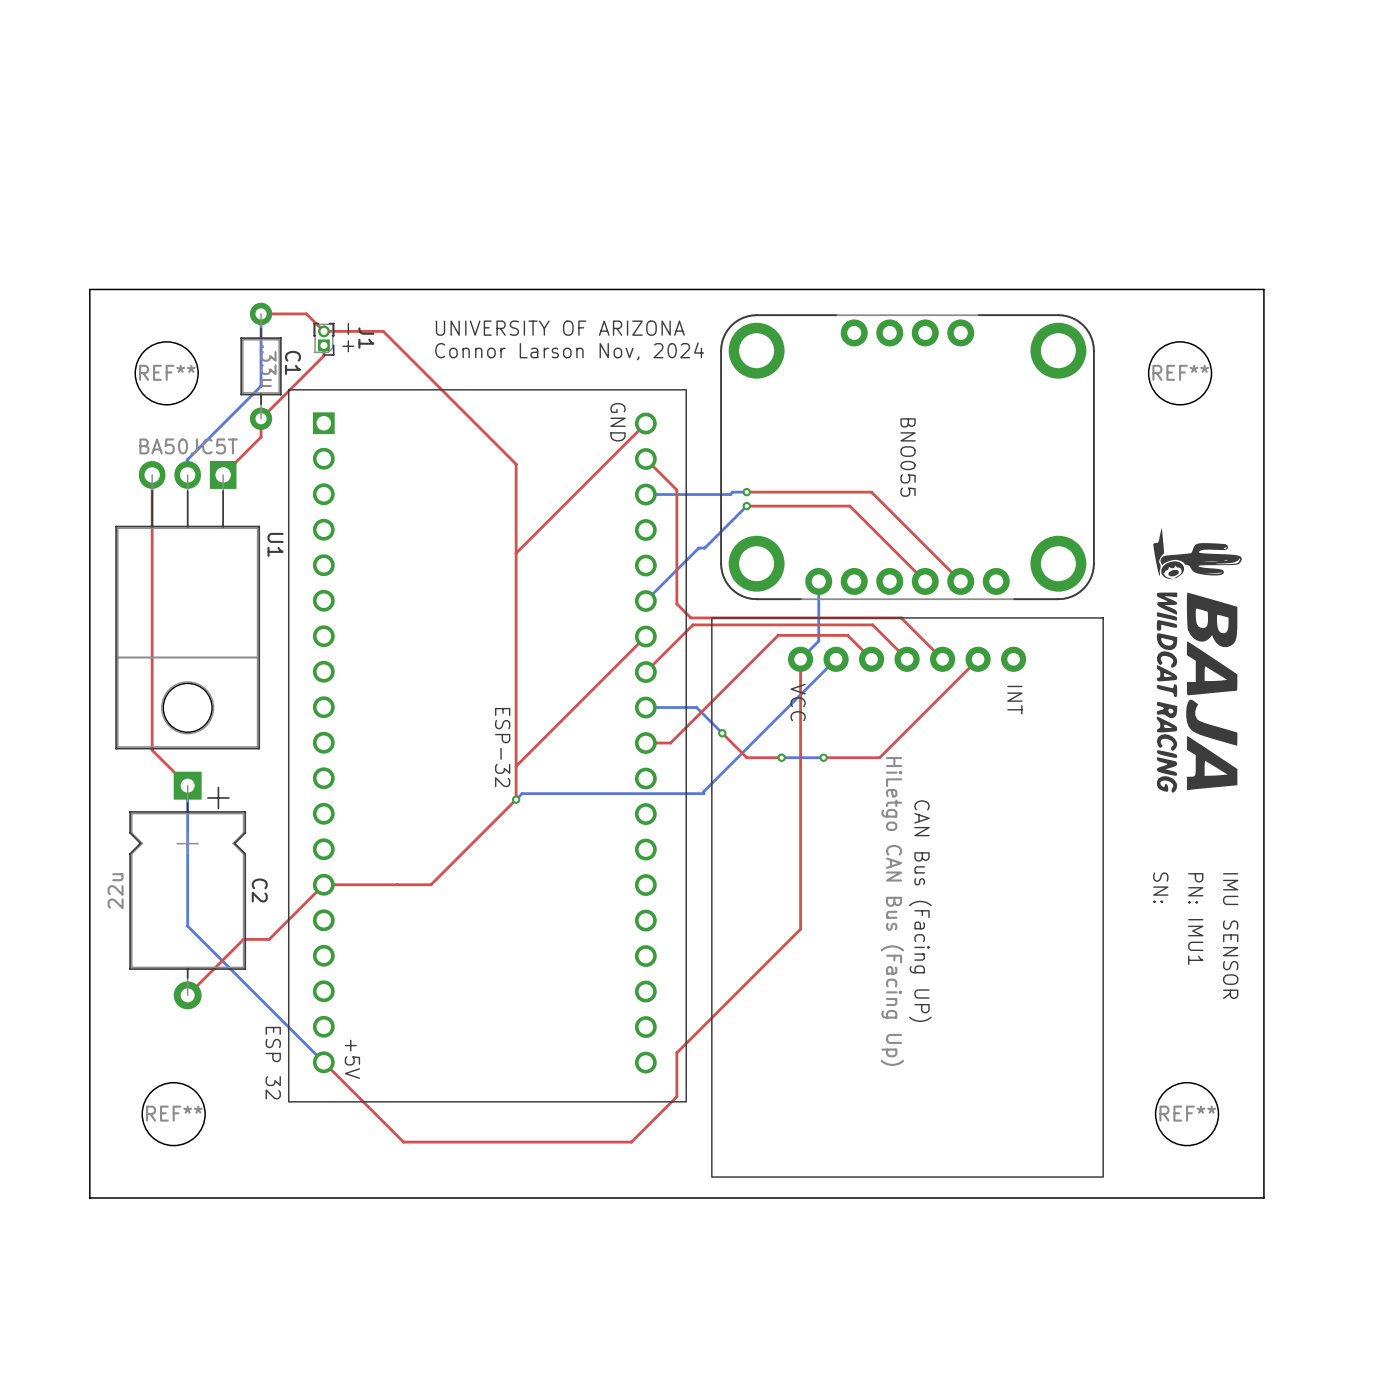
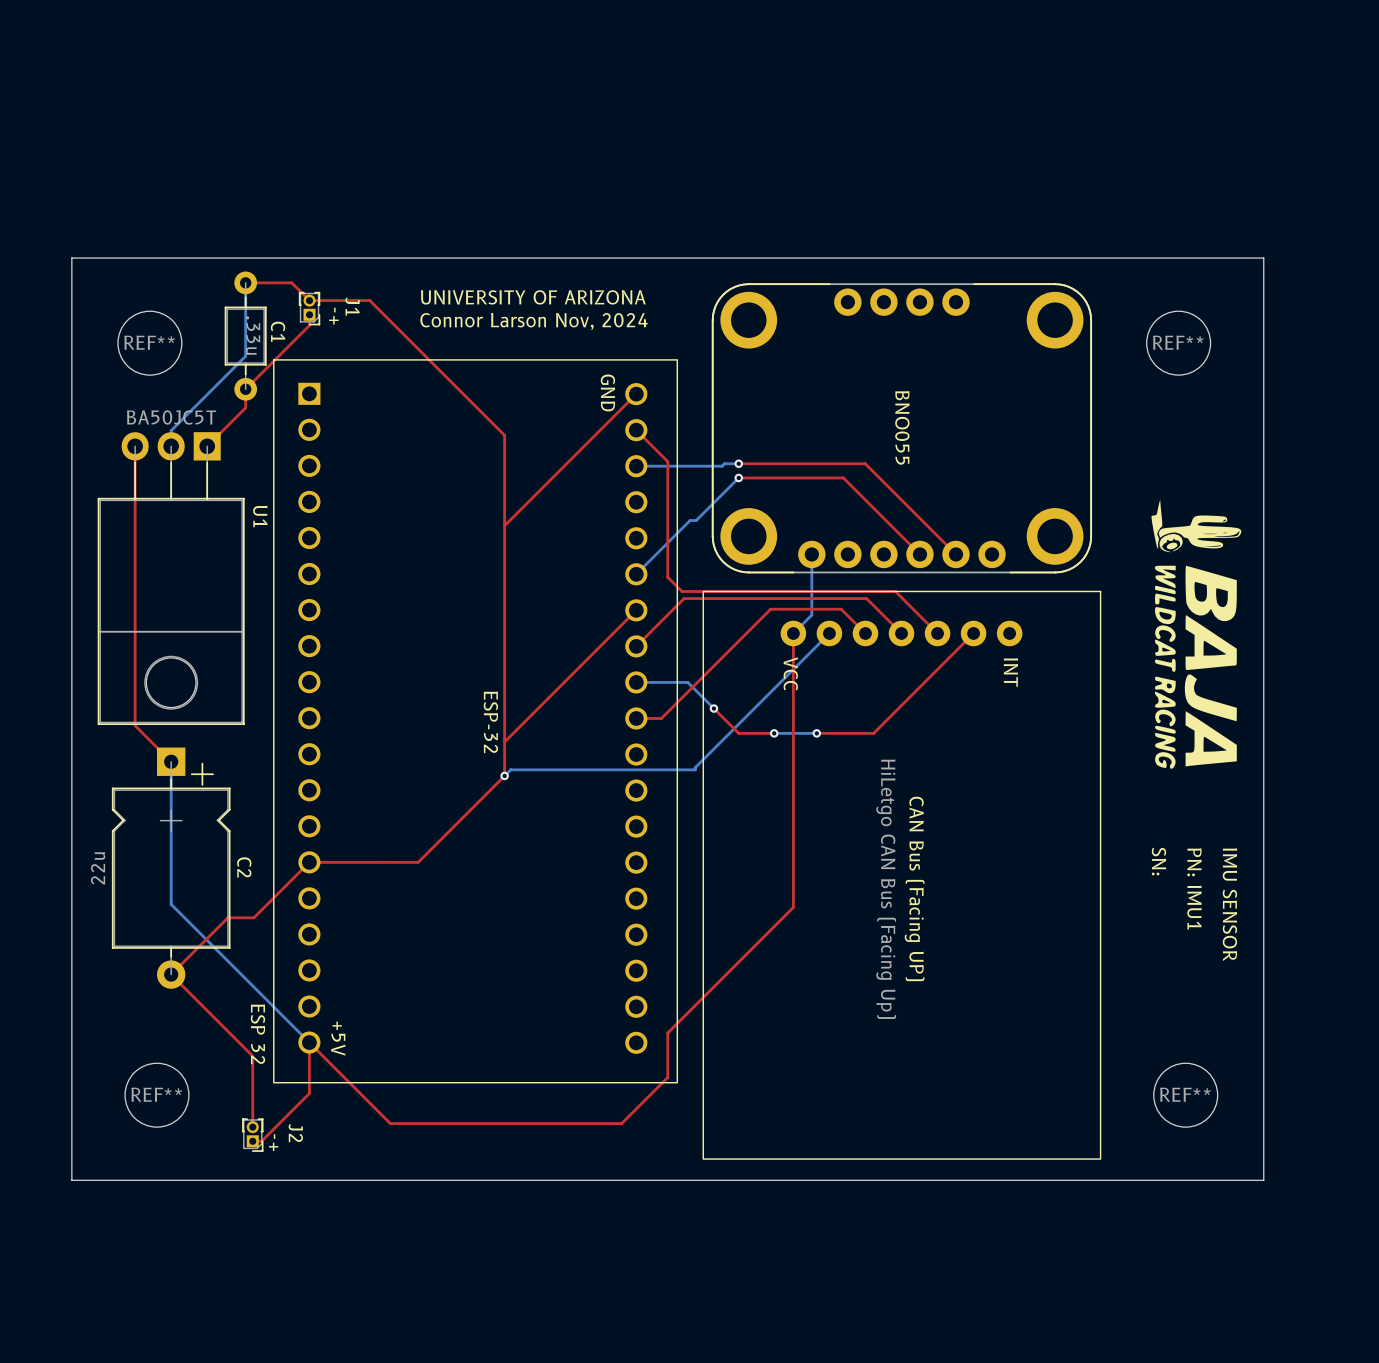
top track: none -> (171, 974) (252, 1056) (252, 1127)
top track: none -> (309, 1042) (309, 1093) (261, 1141) (252, 1141)
text: none -> +- (273, 1142)
J2: none -> (252, 1135)

